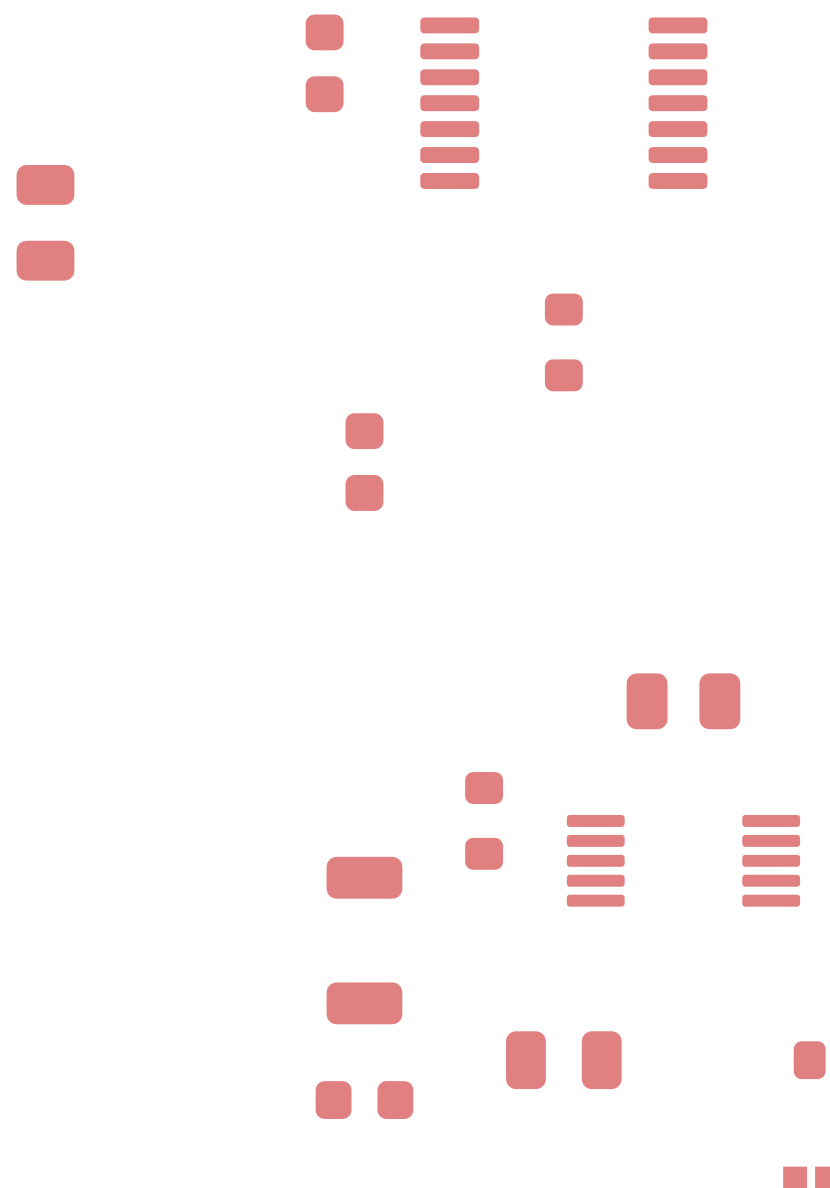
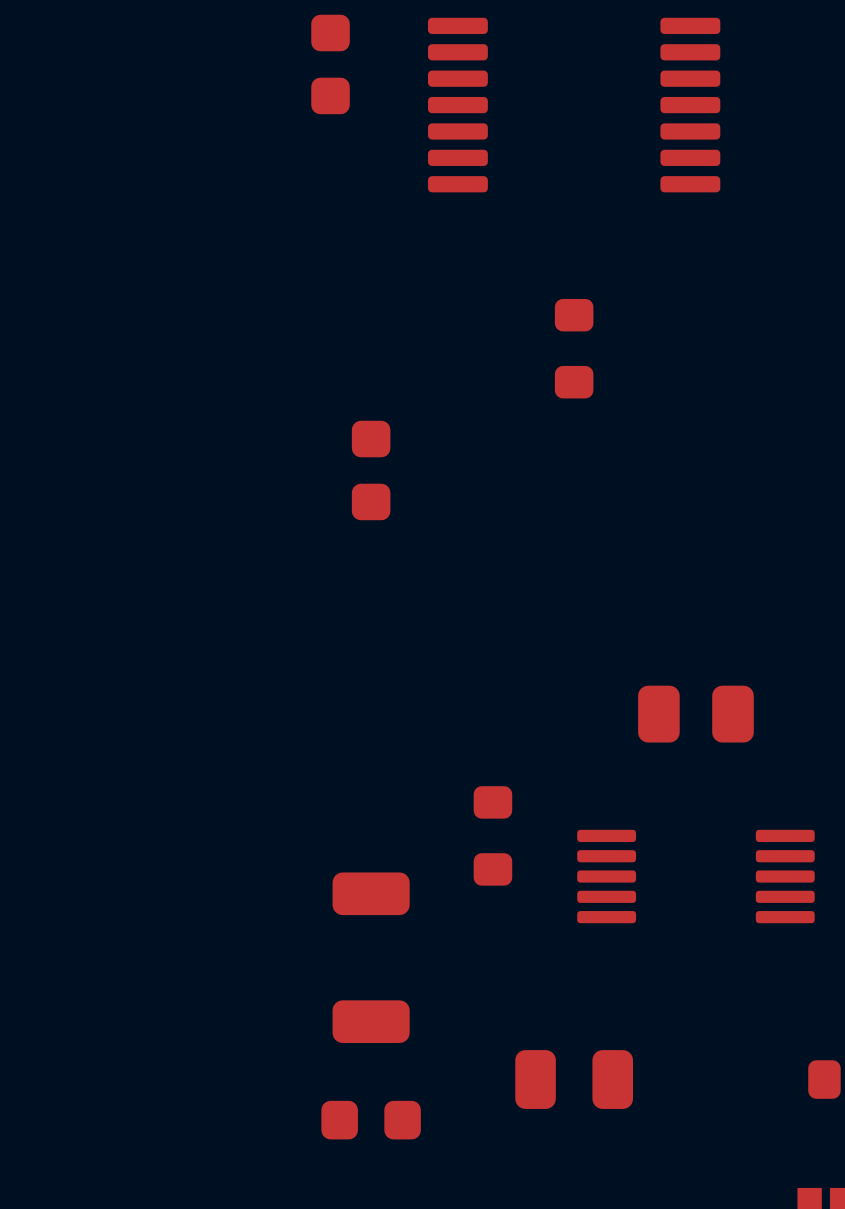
part: (45, 222) -> none

